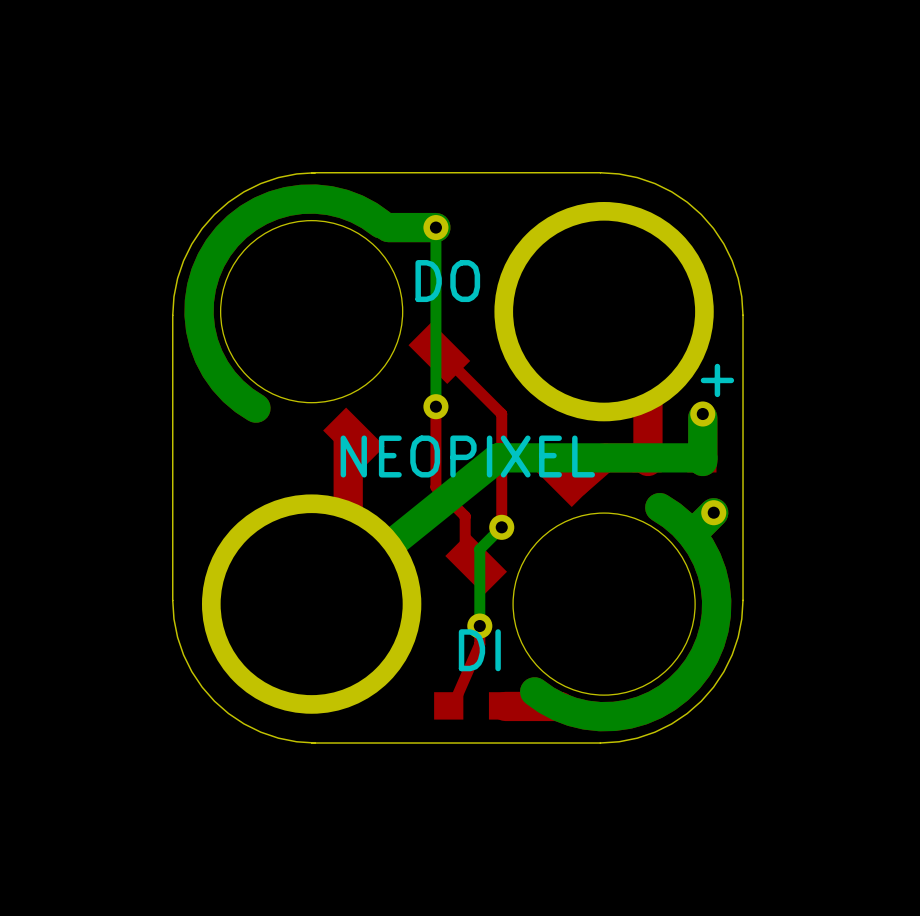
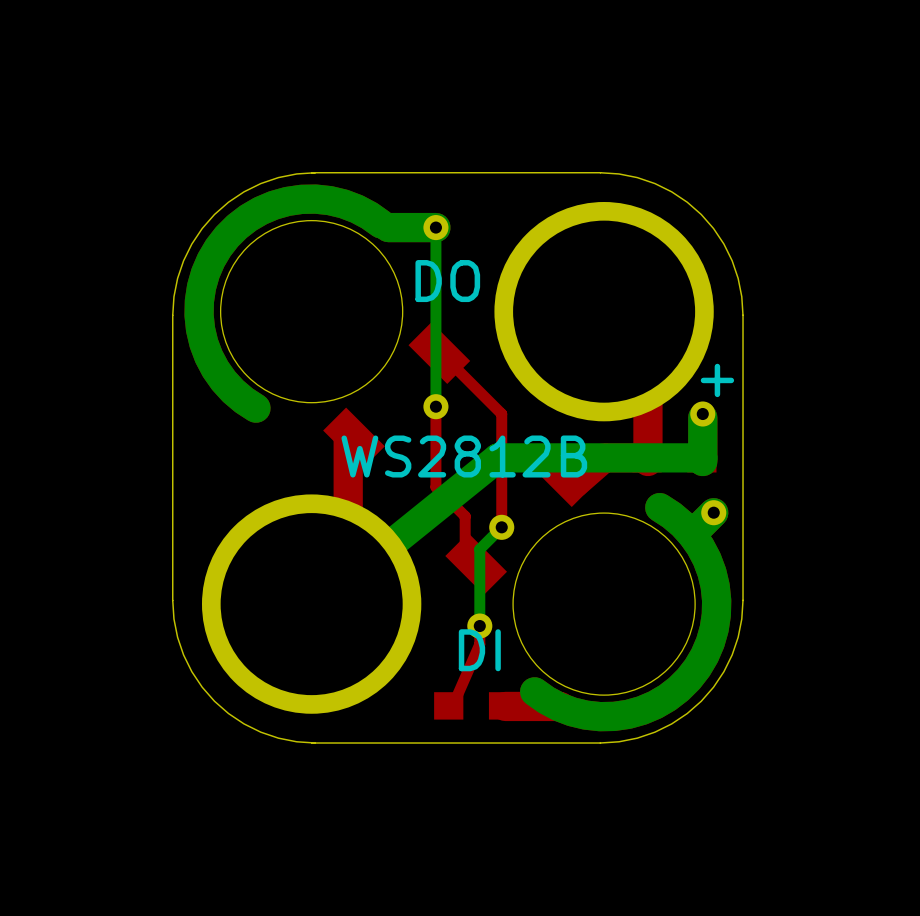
part text: NEOPIXEL (467, 456) -> WS2812B (464, 456)

